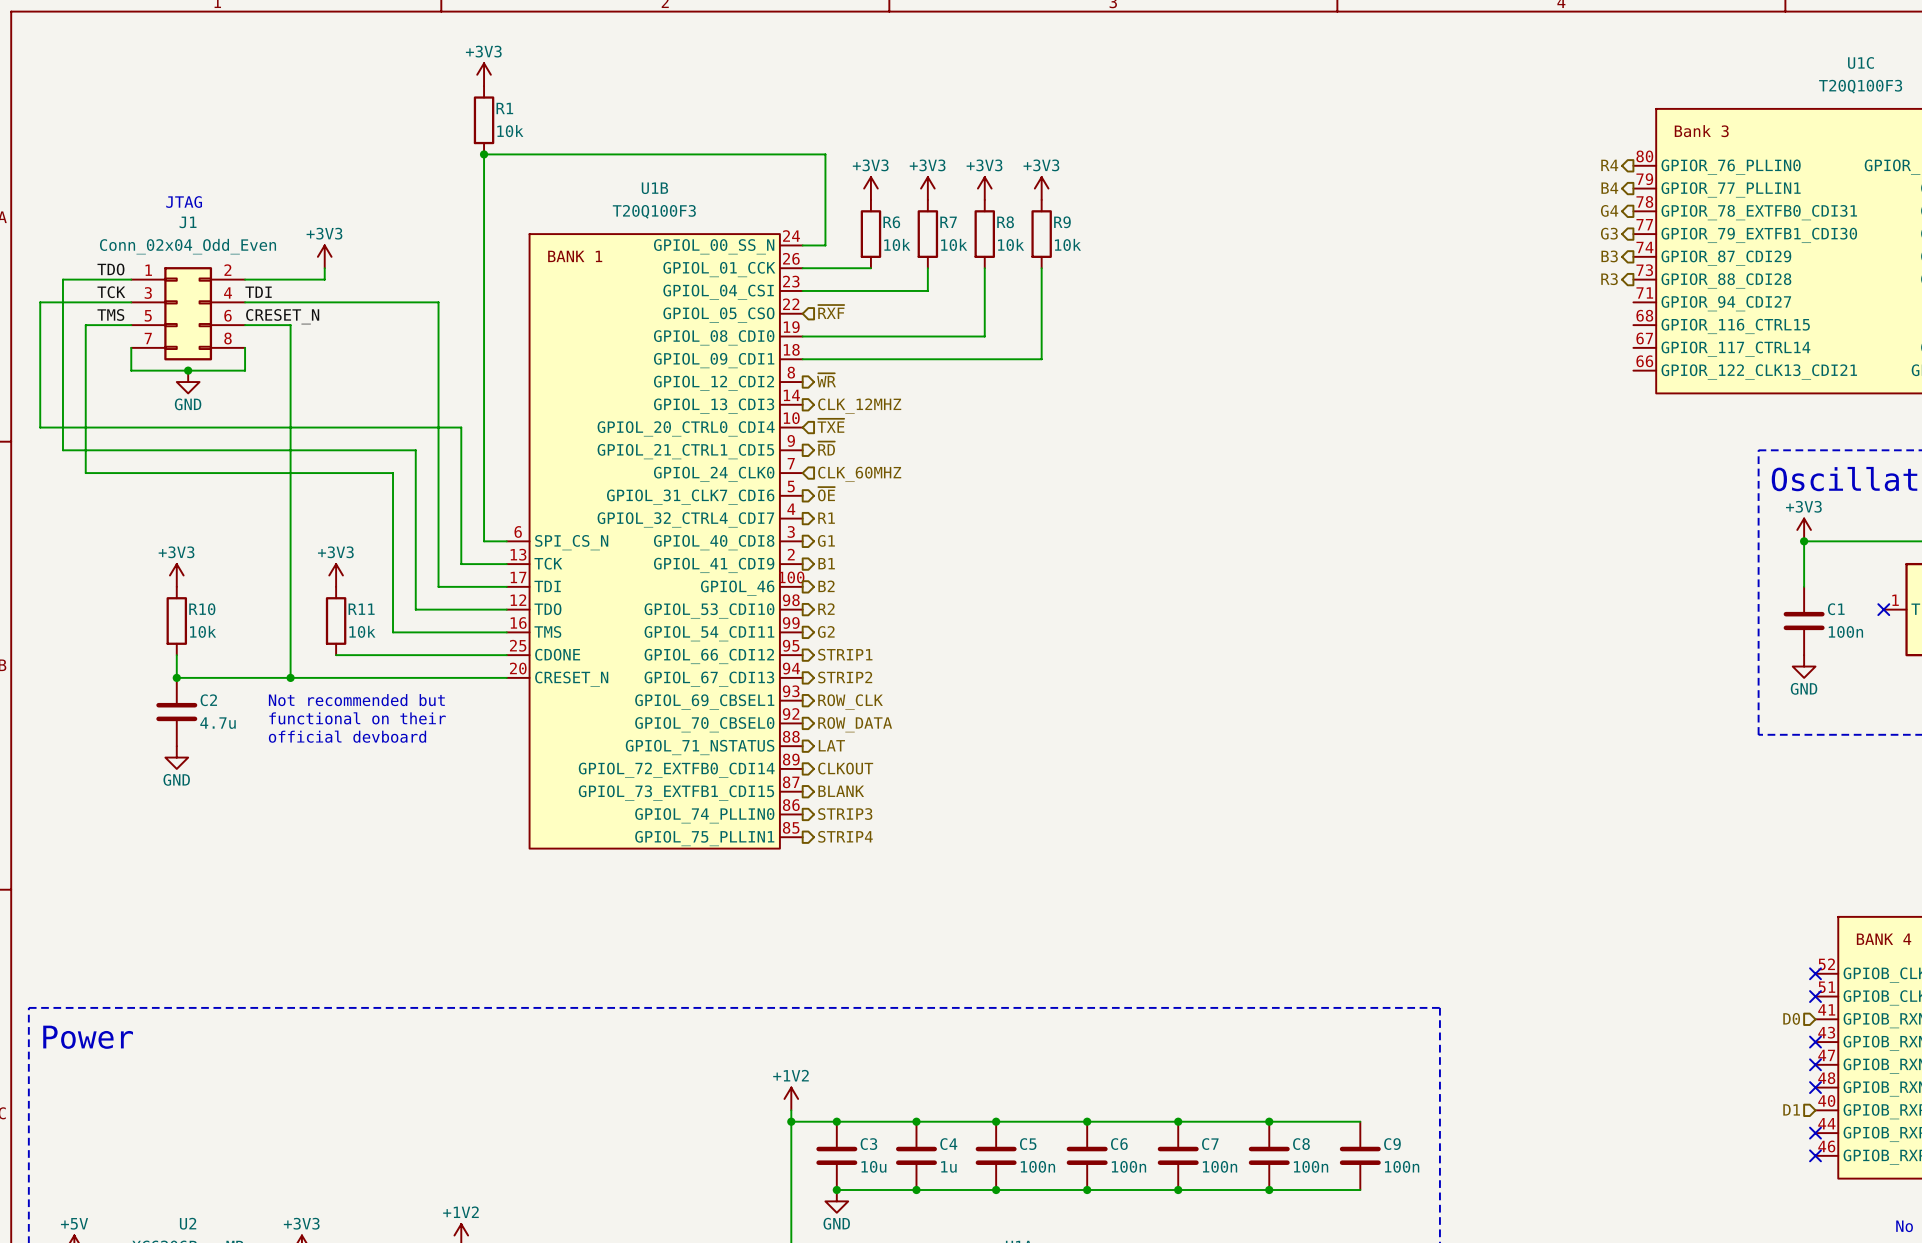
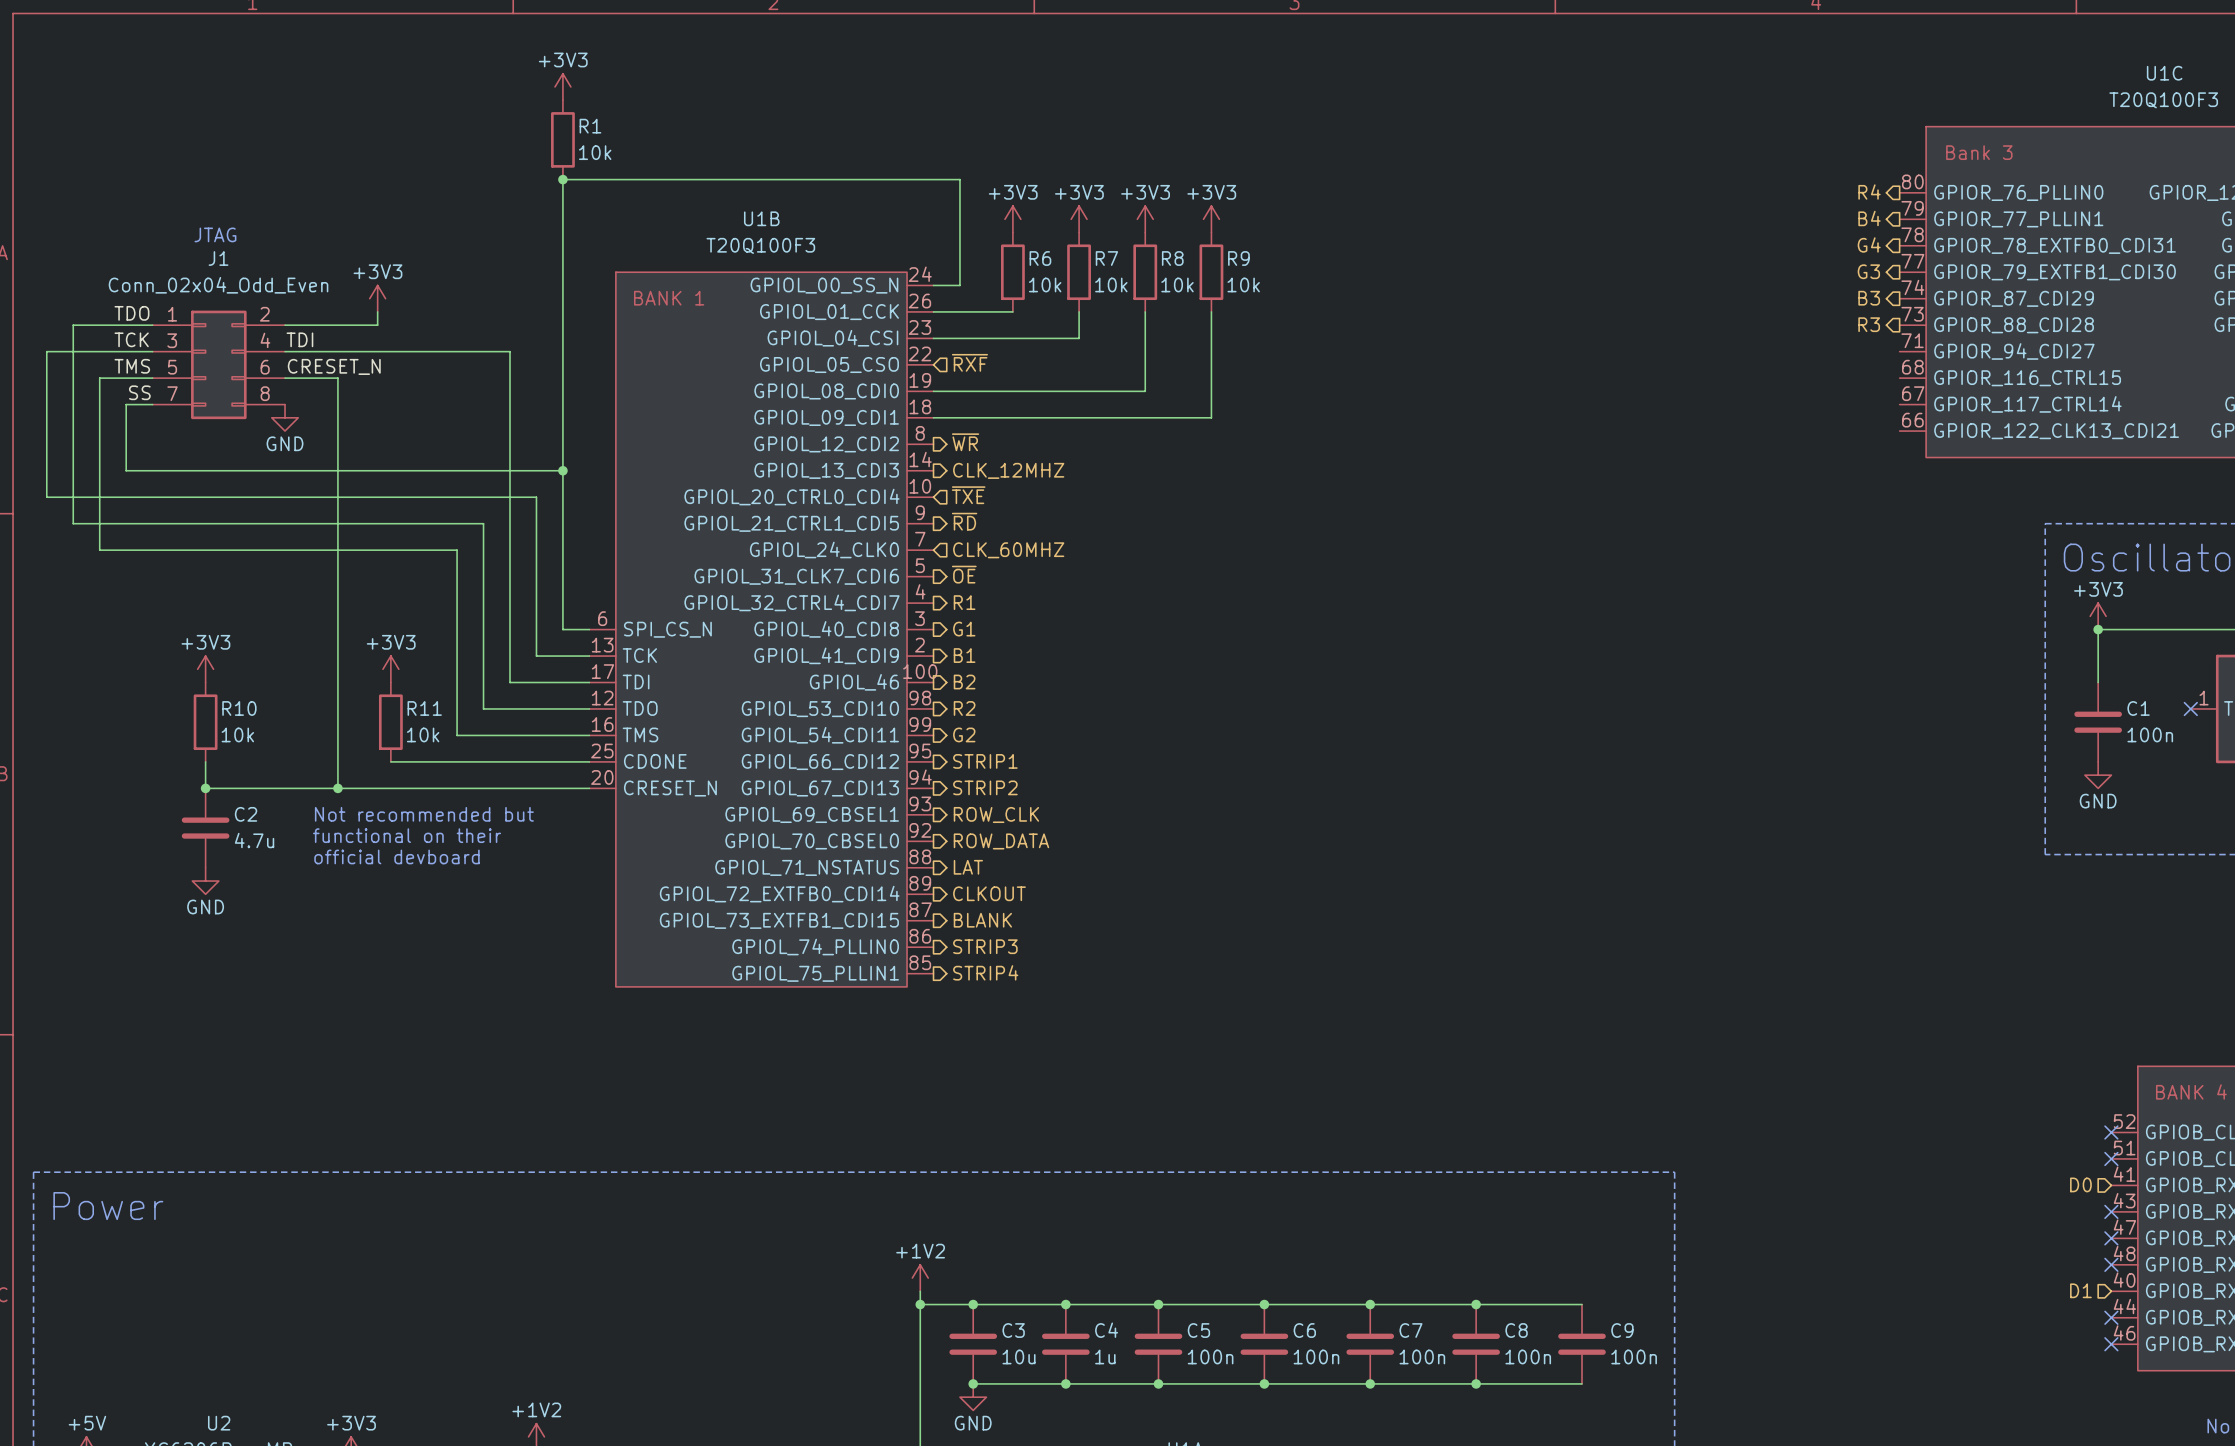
label: none -> SS (139, 392)
wire: (131, 347) (131, 370) (245, 370) (245, 347) -> (152, 404) (126, 404) (126, 470) (562, 470)
junction: (188, 370) -> none
power symbol position: GND (188, 382) -> GND (285, 417)
junction: none -> (562, 470)

